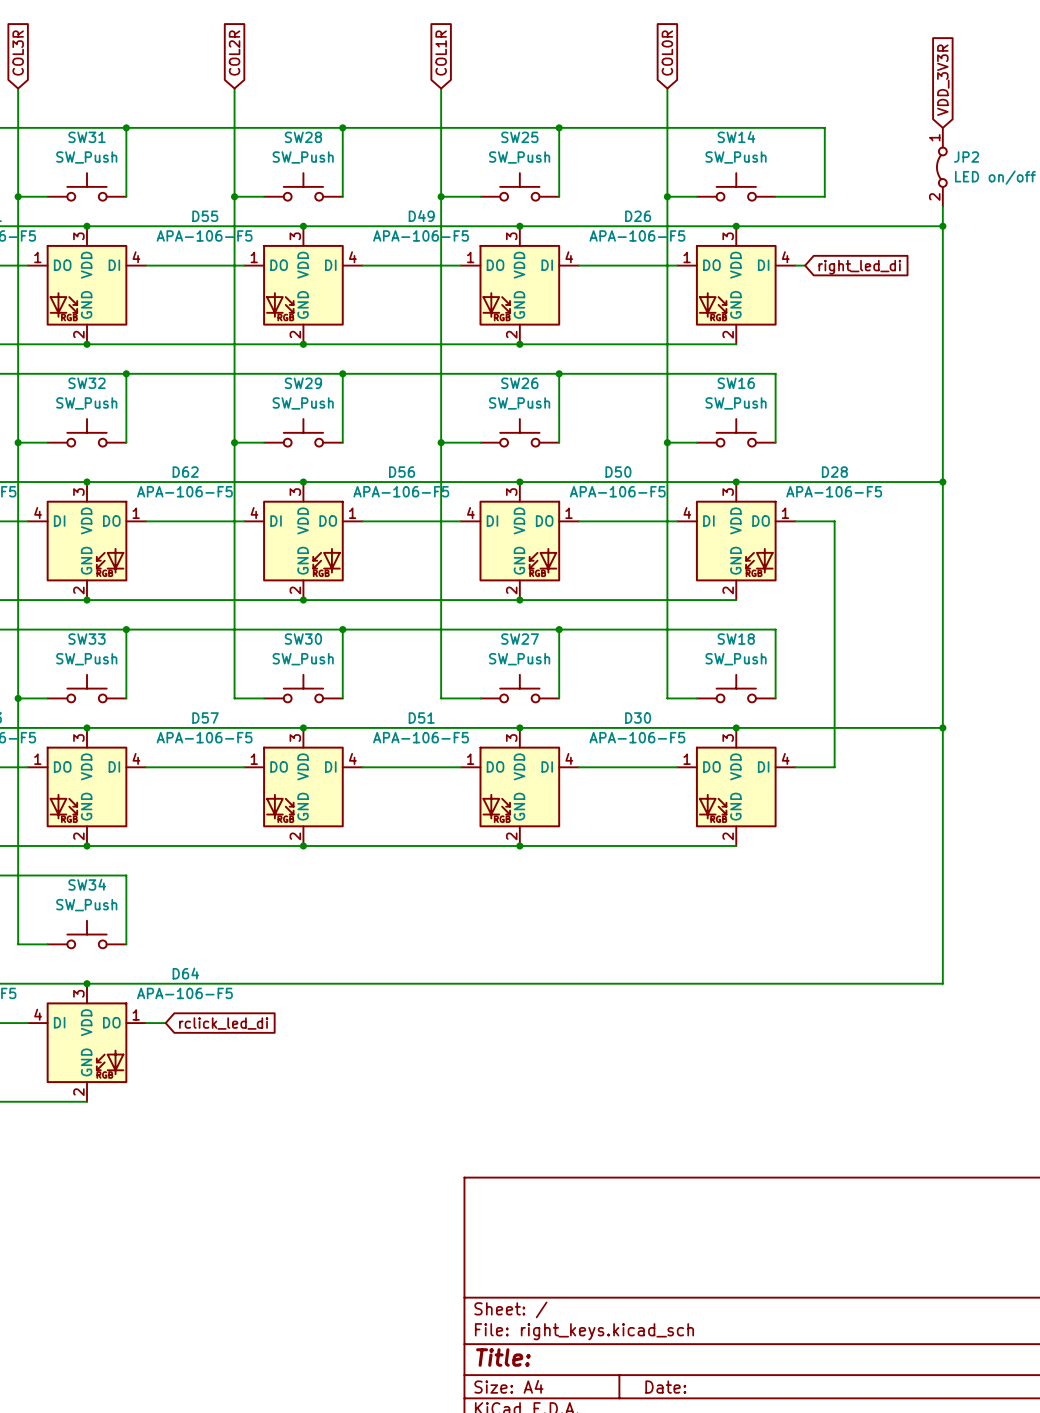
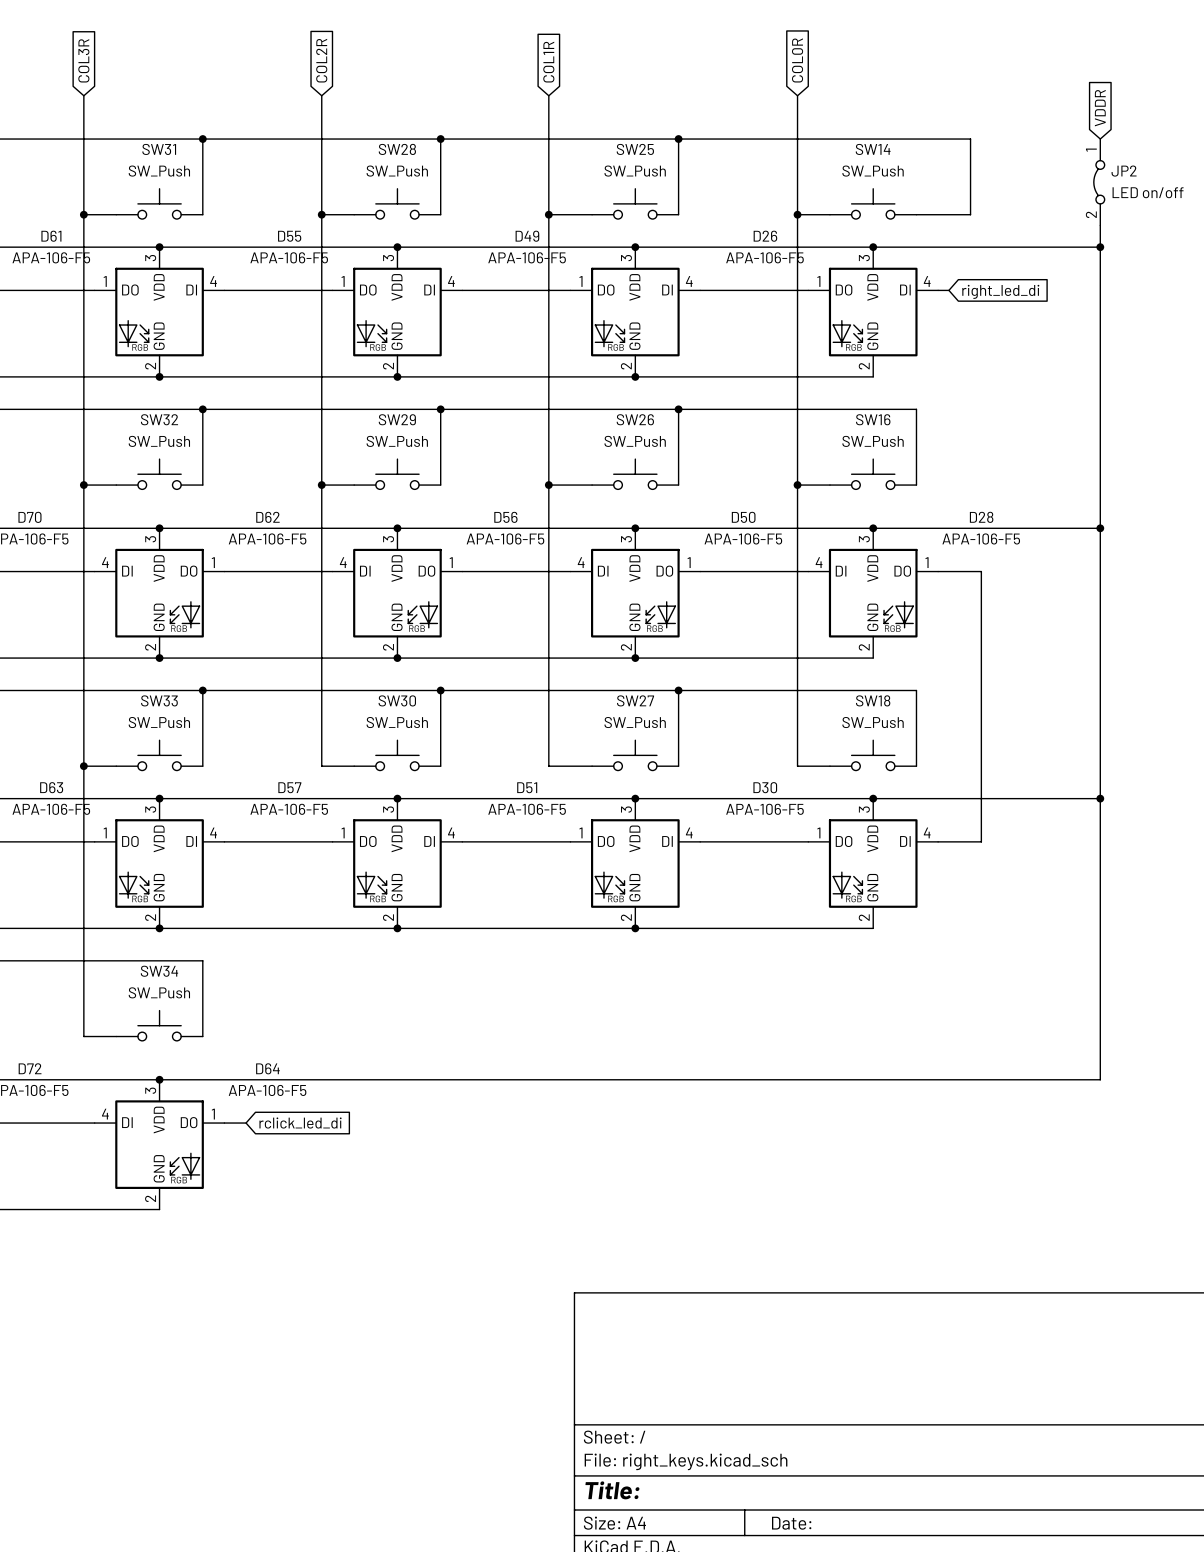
global label: VDD_3V3R (943, 80) -> VDDR (1100, 108)

